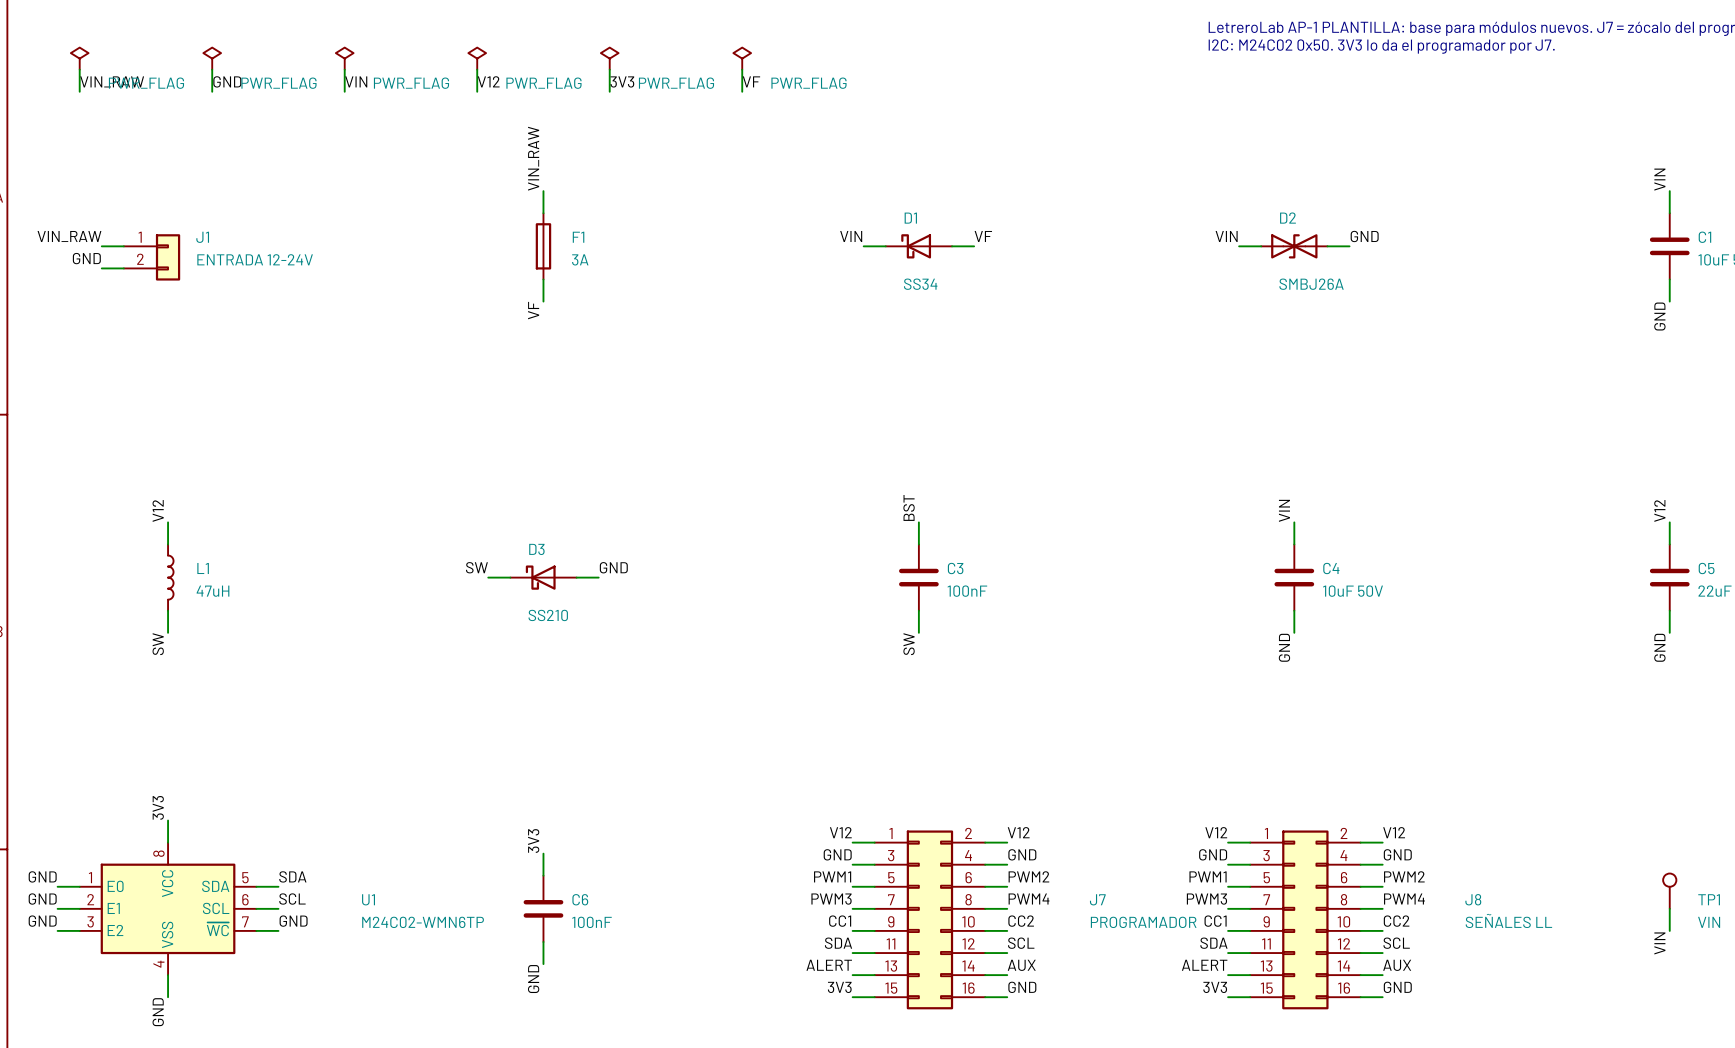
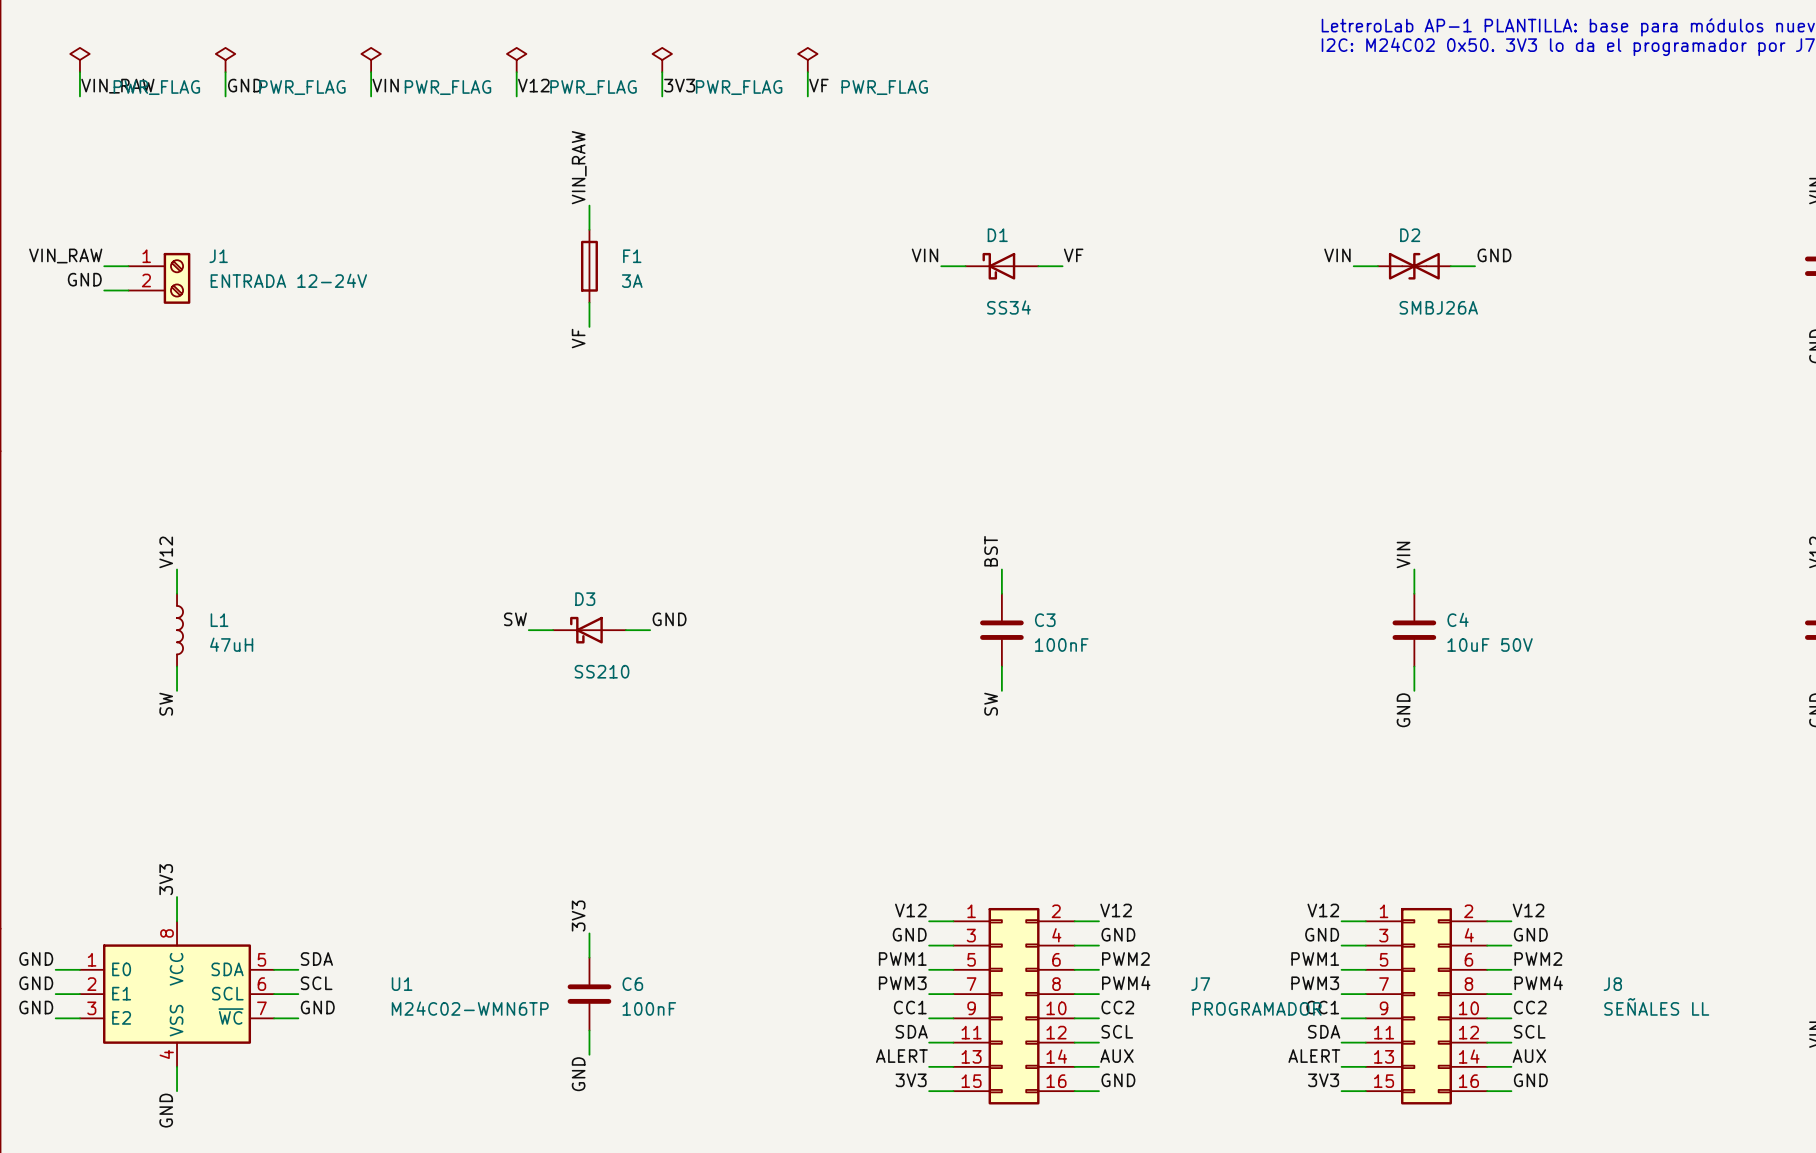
J1 symbol: [123, 234, 181, 281] -> [128, 252, 191, 304]

